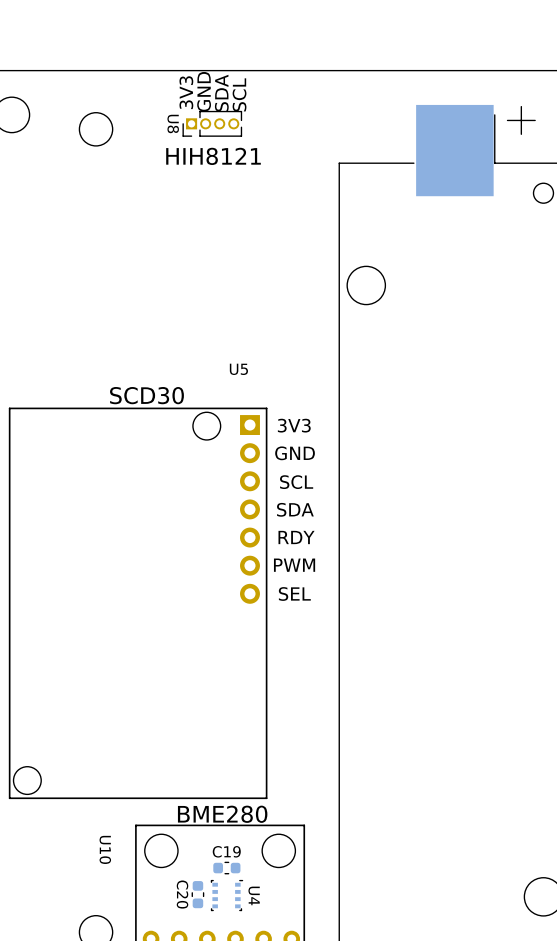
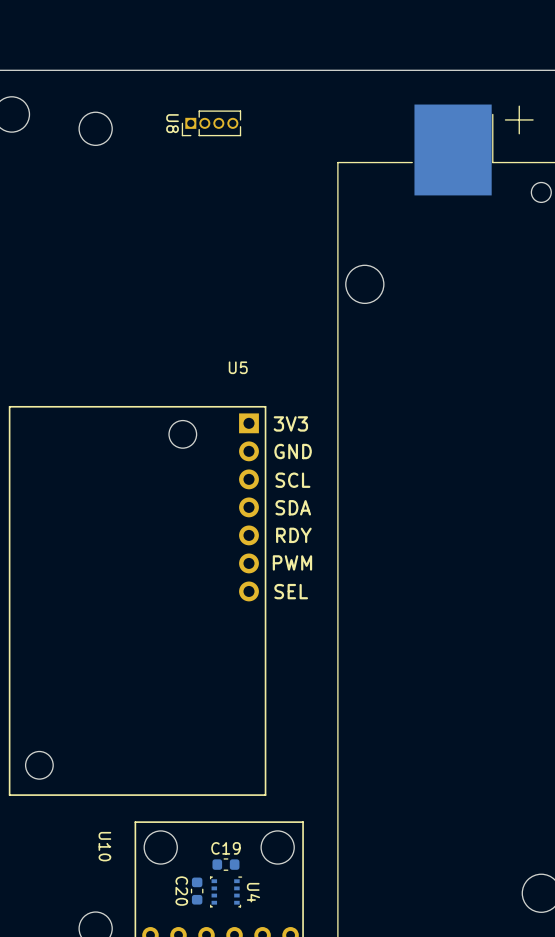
text: GND (204, 91) -> none
text: 3V3 (186, 92) -> none
text: SDA (221, 93) -> none
text: SCL (239, 94) -> none
text: HIH8121 (213, 156) -> none
text: SCD30 (146, 395) -> none
U5 footprint: [8, 407, 268, 800] -> [8, 405, 267, 796]
text: BME280 (222, 814) -> none

